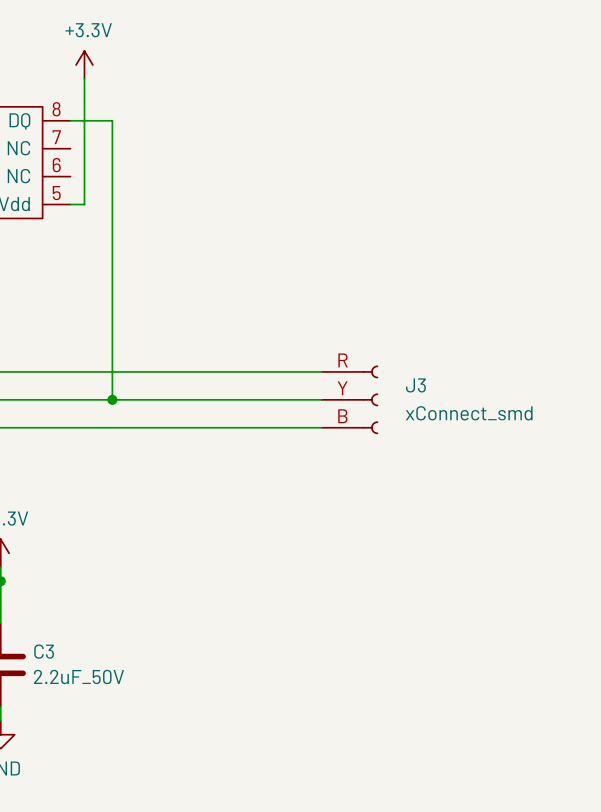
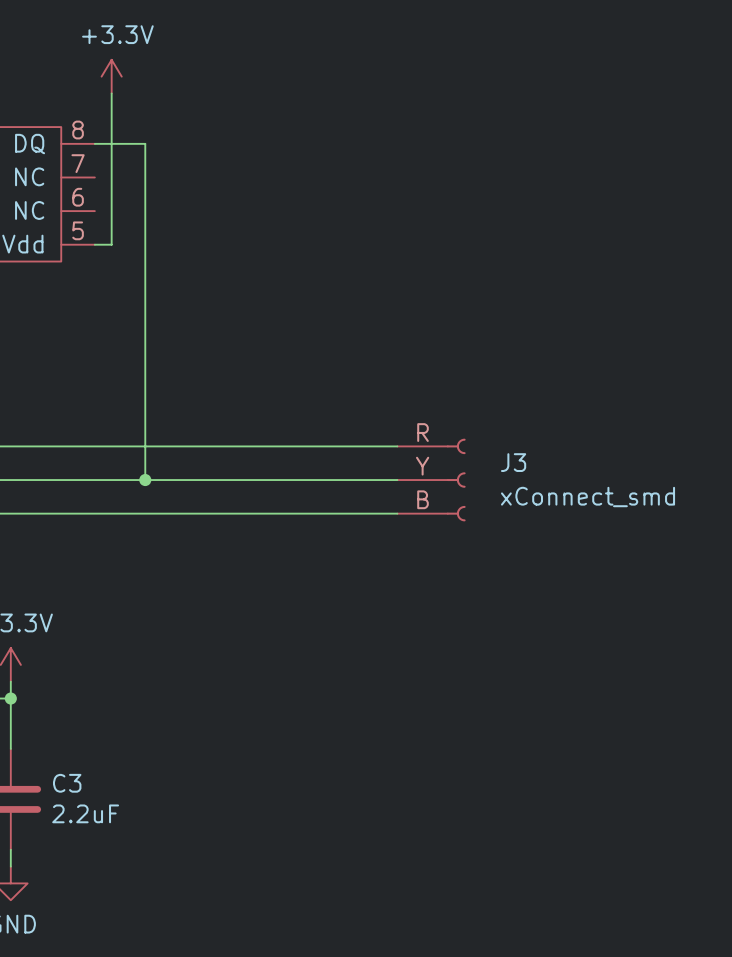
C3 value: 2.2uF_50V (78, 676) -> 2.2uF (85, 813)

